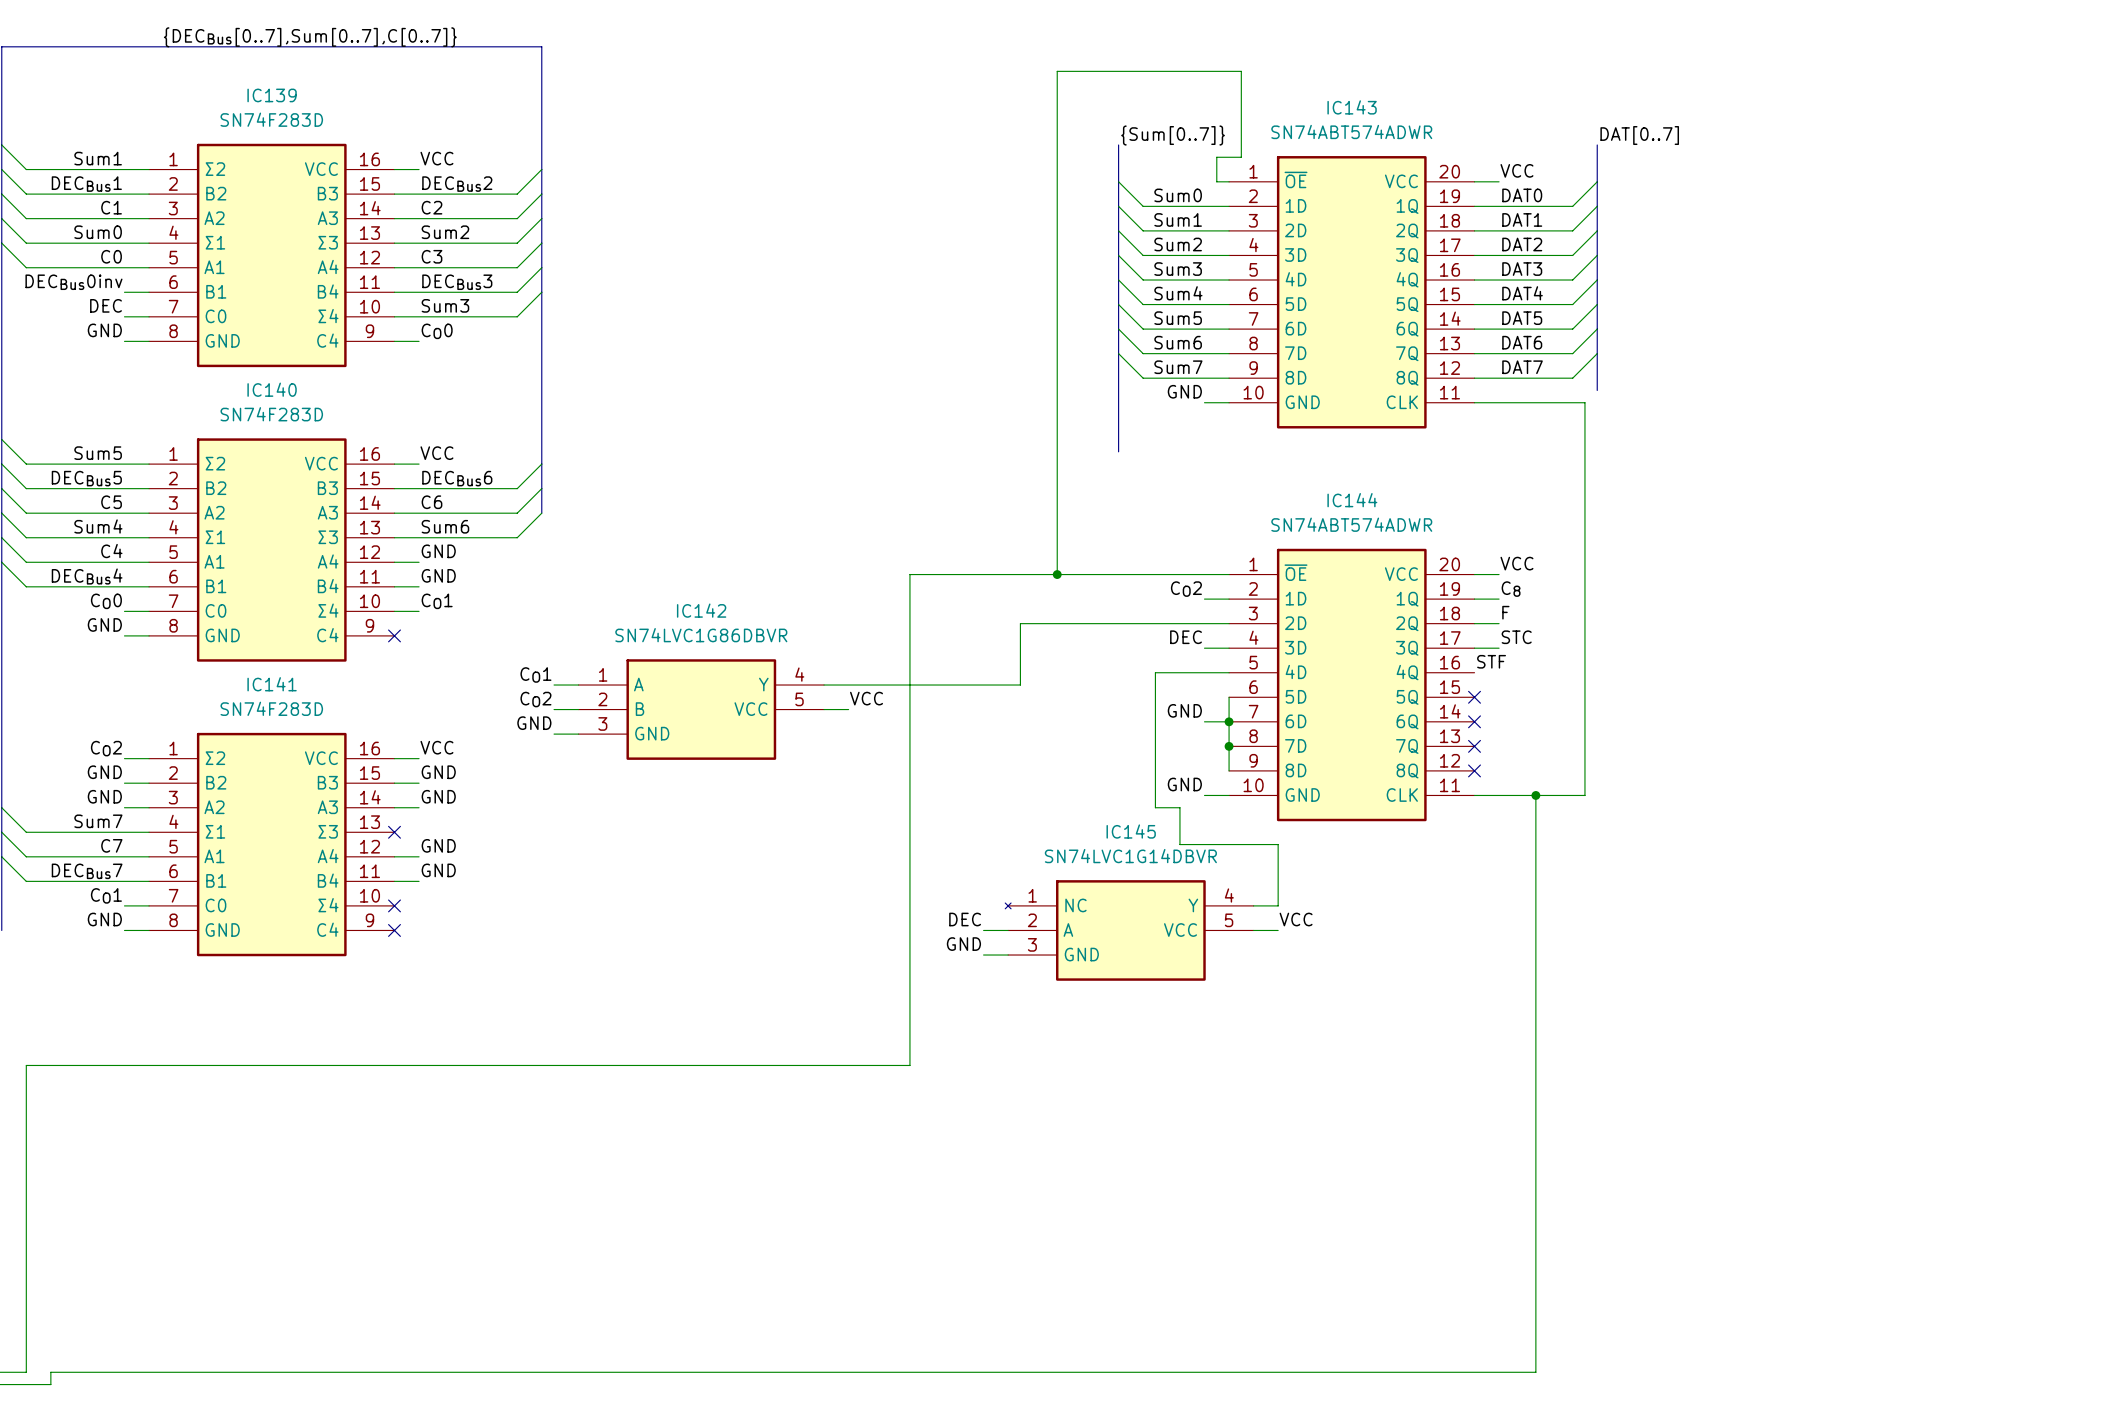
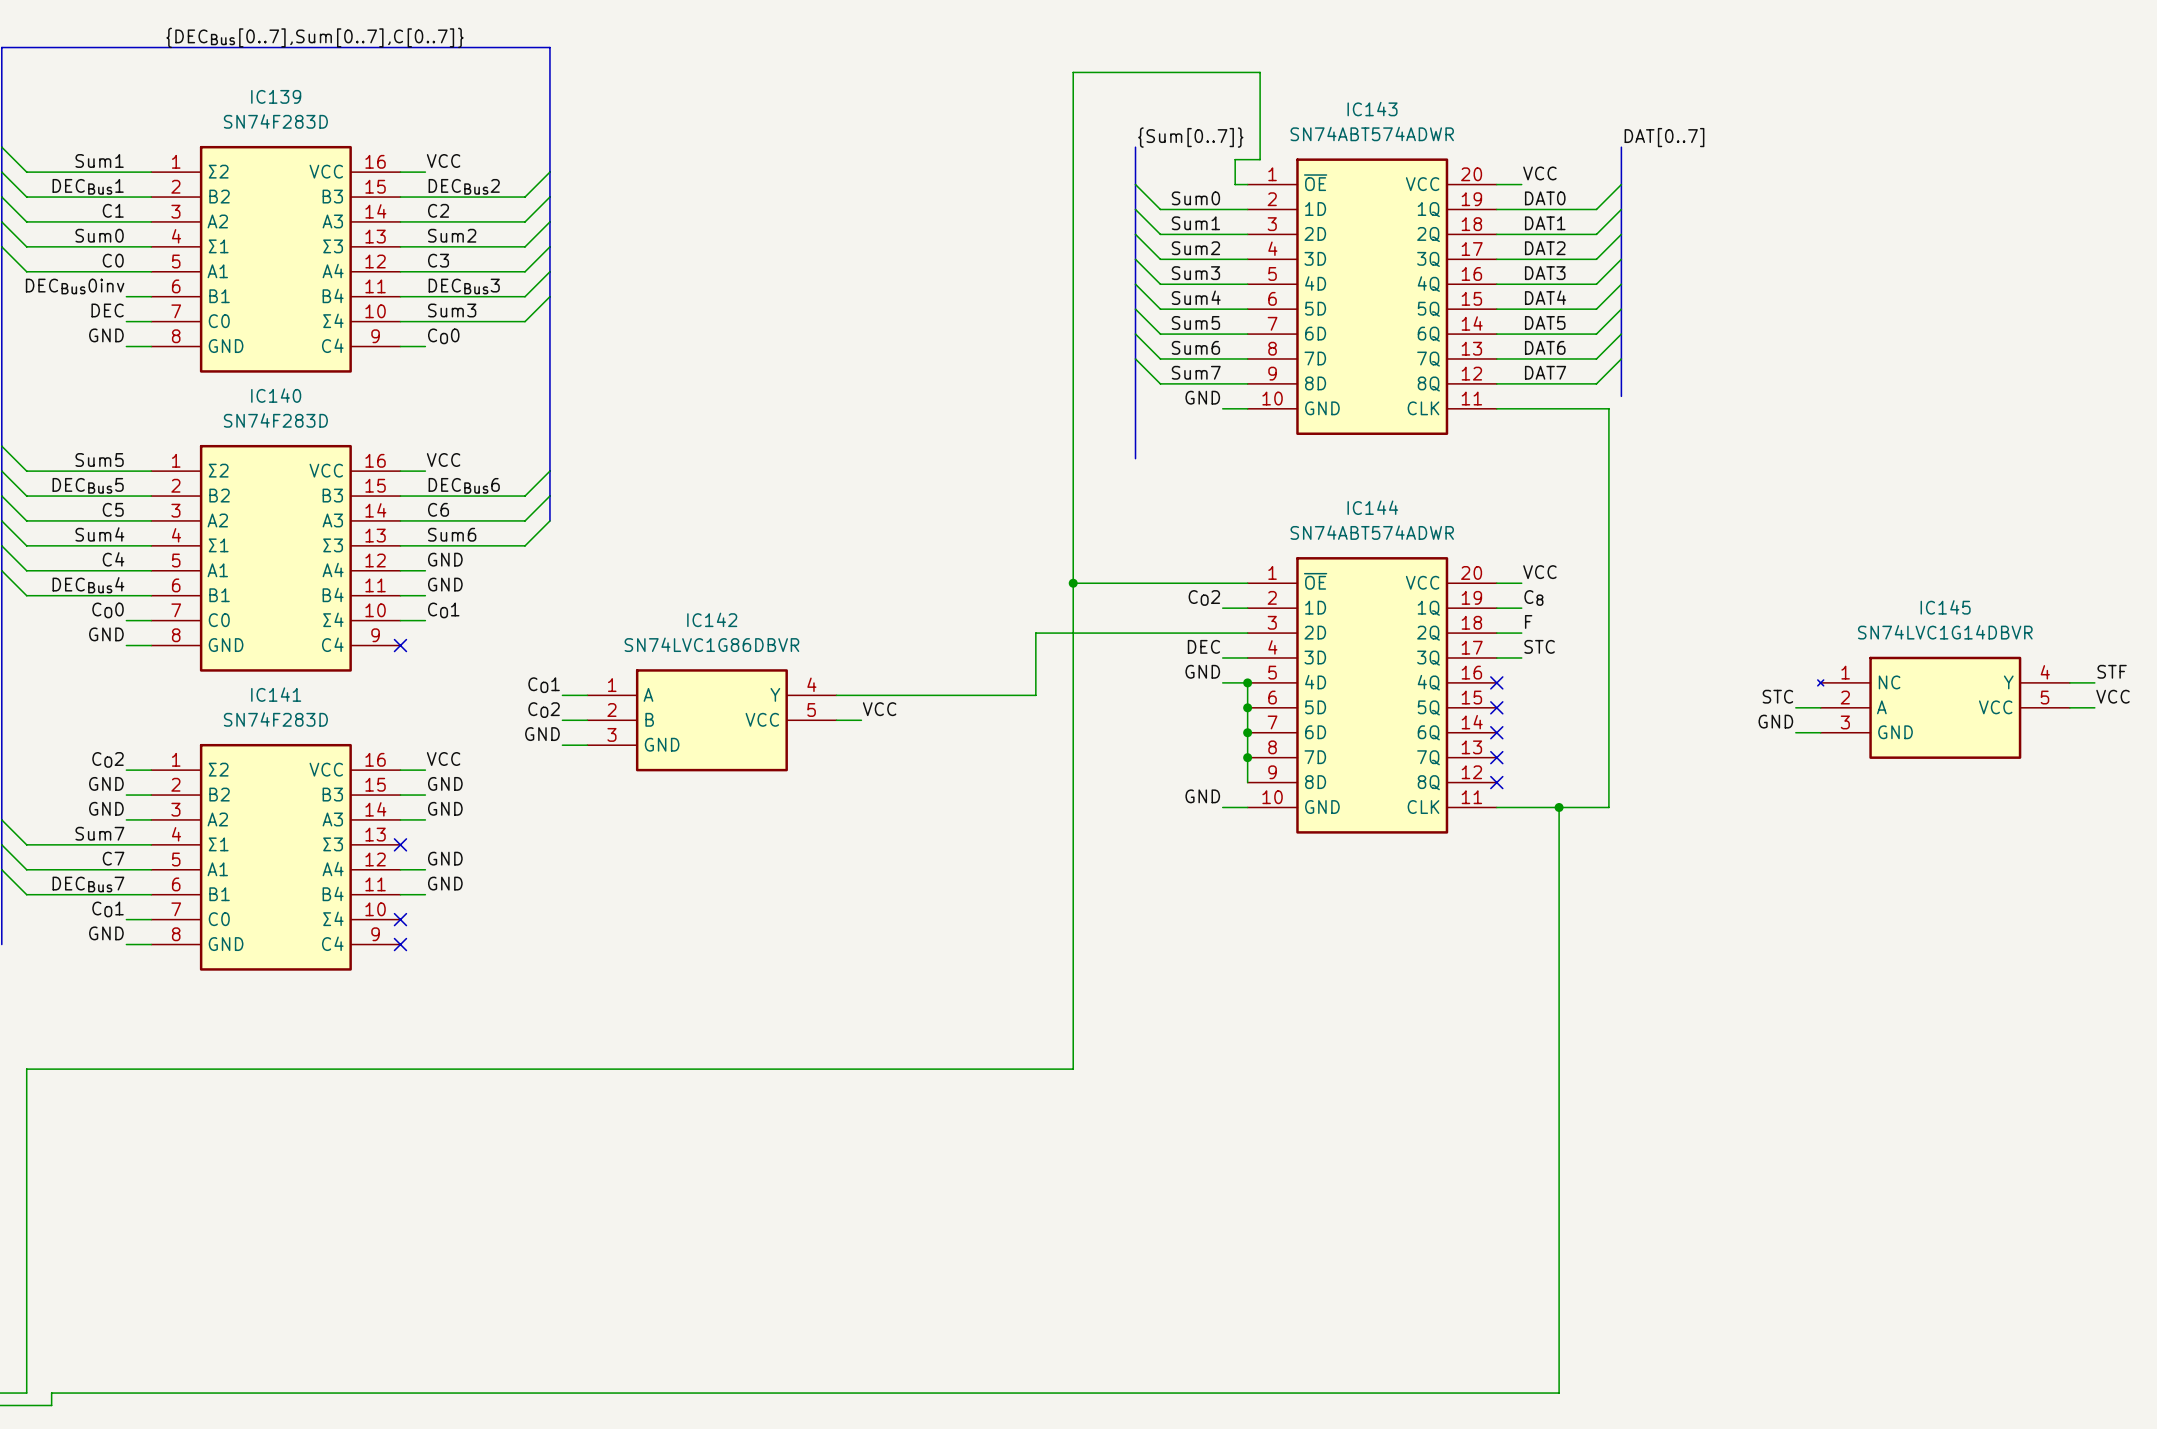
wire: (1057, 574) (909, 574) (909, 1065) (26, 1065) -> (1073, 583) (1073, 1069) (26, 1069) (26, 1081)
label: STF (1491, 661) -> none
label: none -> STF (2112, 671)
wire: (1204, 672) (1155, 672) (1155, 807) (1179, 807) (1179, 844) (1278, 844) (1278, 905) (1253, 905) -> none
wire: none -> (1247, 682) (1247, 707)
junction: none -> (1247, 682)
no-connect mark: none -> (1496, 682)
wire: none -> (2069, 682) (2094, 682)
label: none -> STC (1777, 696)
label: none -> VCC (2112, 696)
junction: none -> (1247, 707)
wire: none -> (1795, 707) (1820, 707)
wire: none -> (2069, 707) (2094, 707)
label position: GND (1184, 710) -> GND (1202, 671)
label: none -> GND (1775, 721)
wire: (1204, 721) (1229, 721) -> none
wire: none -> (1795, 732) (1820, 732)
label: DEC (965, 919) -> none
label: VCC (1296, 919) -> none
wire: (983, 930) (1008, 930) -> none
IC145 position: (1129, 930) -> (1943, 707)
wire: (1253, 930) (1278, 930) -> none
label: GND (963, 944) -> none
wire: (983, 955) (1008, 955) -> none

